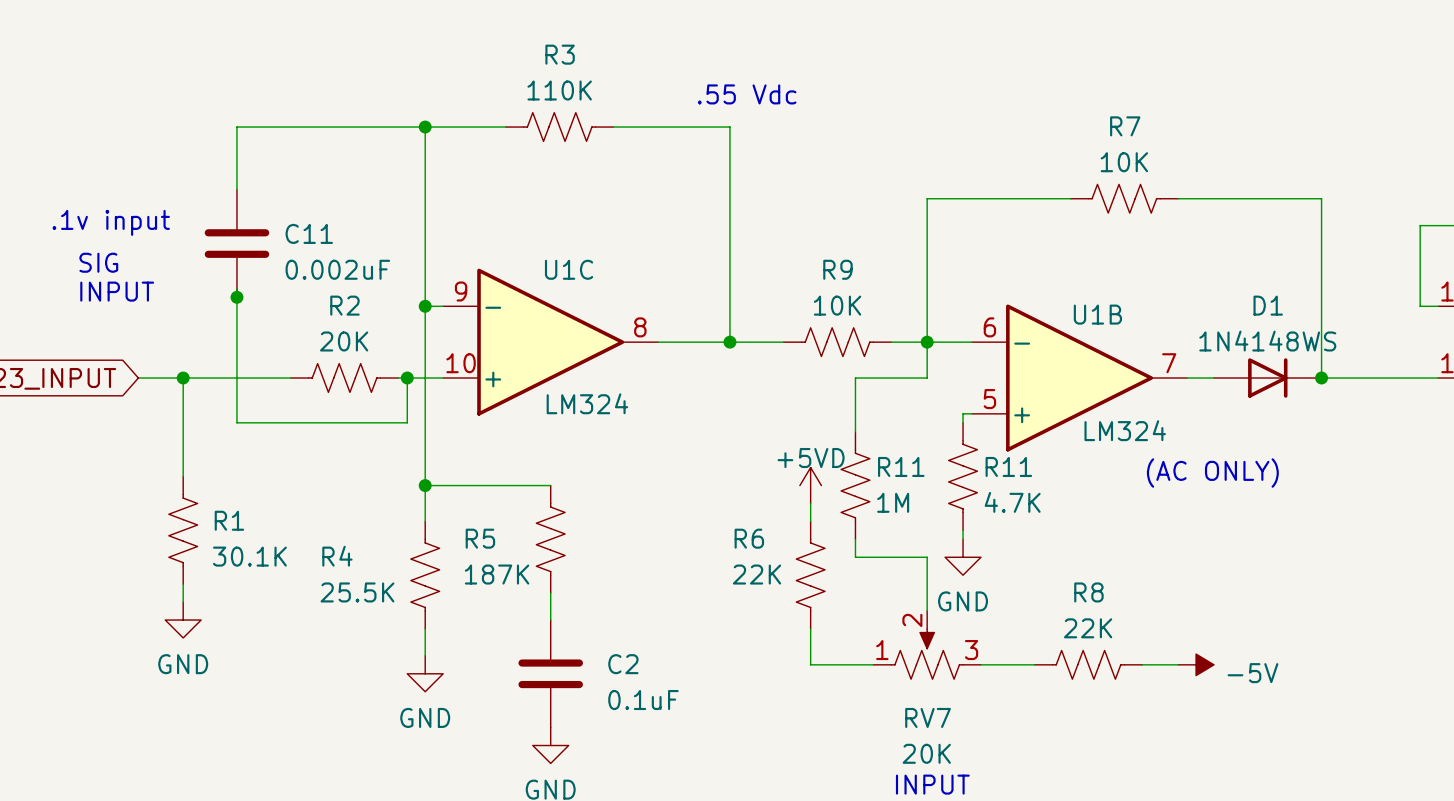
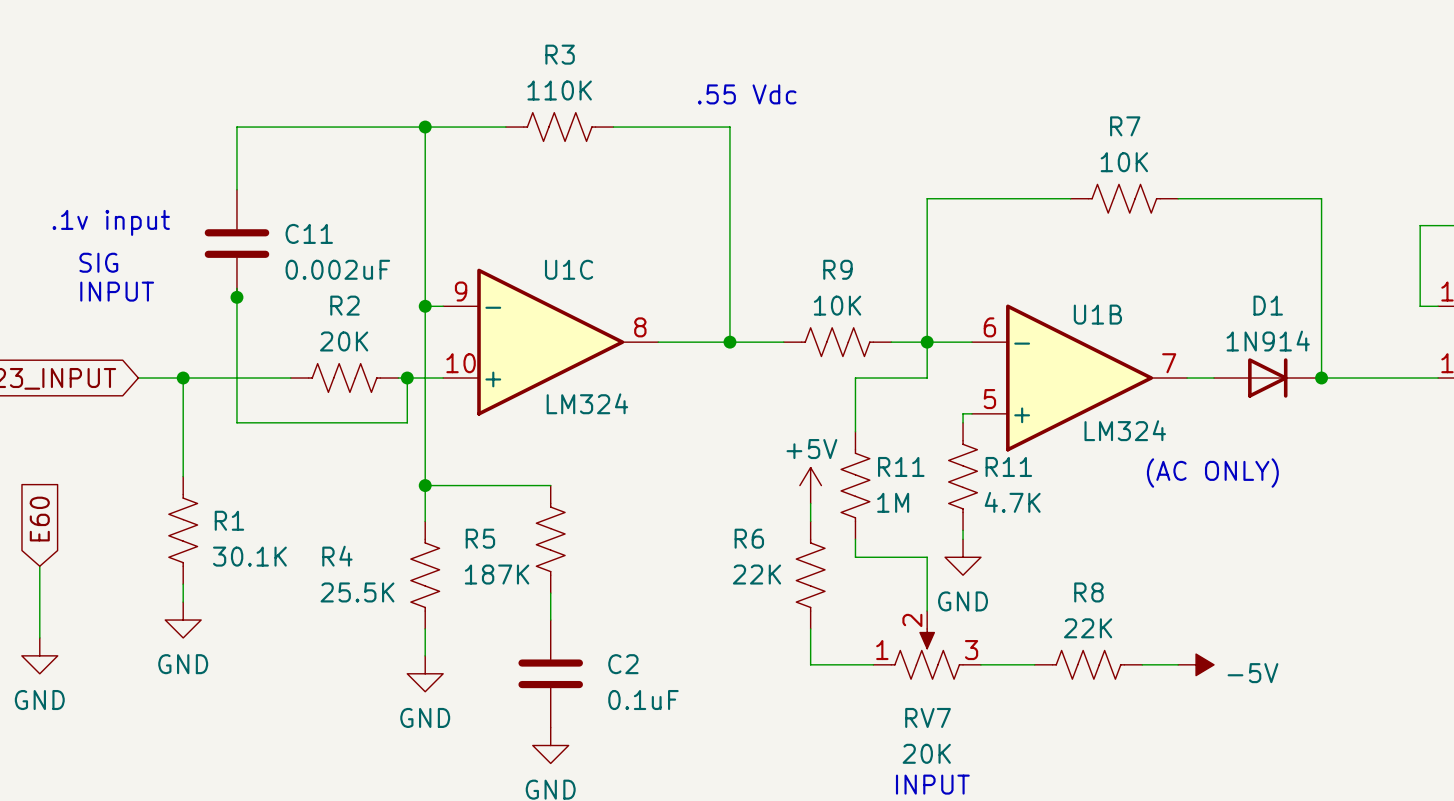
D1 value: 1N4148WS (1267, 341) -> 1N914 (1268, 341)
power symbol: +5VD (810, 485) -> +5V (810, 485)
global label: none -> E60 (39, 519)
wire: none -> (39, 566) (39, 637)
power symbol: none -> GND (39, 655)

